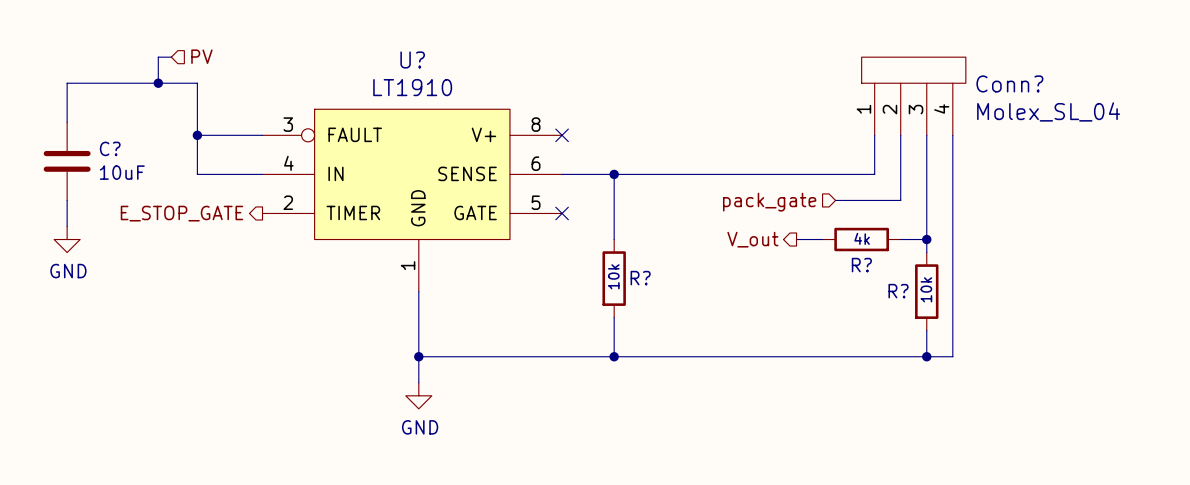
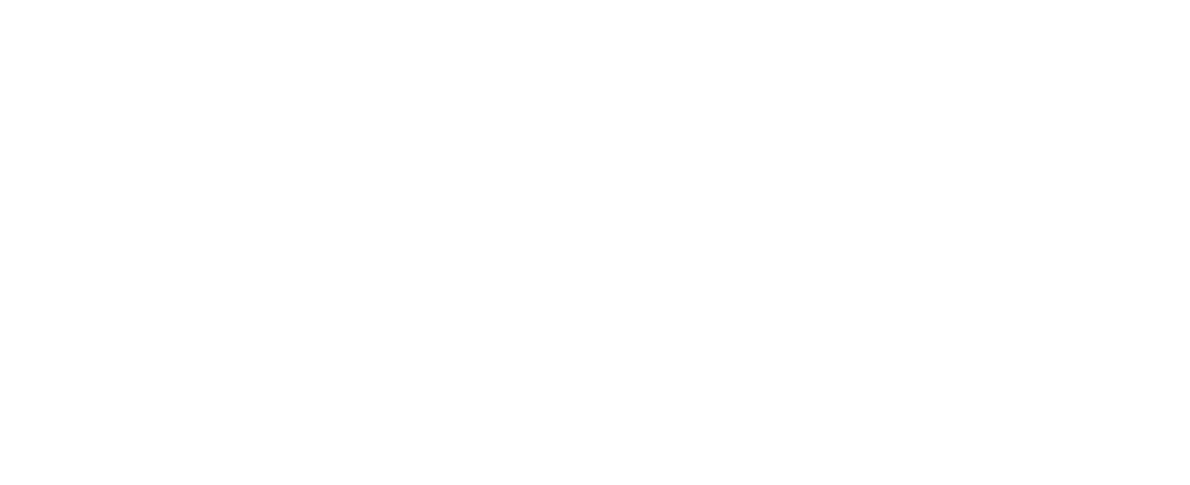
hierarchical label: PV (201, 56) -> none
wire: (171, 57) (158, 57) (158, 83) -> none
junction: (158, 83) -> none
Conn?: Molex_SL_04 (913, 96) -> none
wire: (67, 122) (67, 83) (197, 83) (197, 174) (262, 174) -> none
wire: (197, 135) (262, 135) -> none
junction: (197, 135) -> none
no-connect mark: (562, 135) -> none
wire: (874, 135) (874, 174) (562, 174) -> none
wire: (900, 135) (900, 200) (835, 200) -> none
wire: (926, 135) (926, 252) -> none
wire: (952, 135) (952, 356) (418, 356) -> none
C?: 10uF (67, 161) -> none
wire: (614, 174) (614, 239) -> none
junction: (614, 174) -> none
wire: (67, 200) (67, 226) -> none
U?: LT1910 (412, 200) -> none
hierarchical label: pack_gate (769, 202) -> none
hierarchical label: E_STOP_GATE (181, 213) -> none
no-connect mark: (562, 213) -> none
power symbol: GND (67, 239) -> none
hierarchical label: V_out (752, 239) -> none
wire: (796, 239) (822, 239) -> none
R?: 4k (861, 239) -> none
wire: (900, 239) (926, 239) -> none
junction: (926, 239) -> none
R?: 10k (614, 278) -> none
wire: (418, 291) (418, 382) -> none
R?: 10k (926, 291) -> none
wire: (614, 317) (614, 356) -> none
wire: (926, 330) (926, 356) -> none
junction: (418, 356) -> none
junction: (614, 356) -> none
junction: (926, 356) -> none
power symbol: GND (418, 395) -> none

